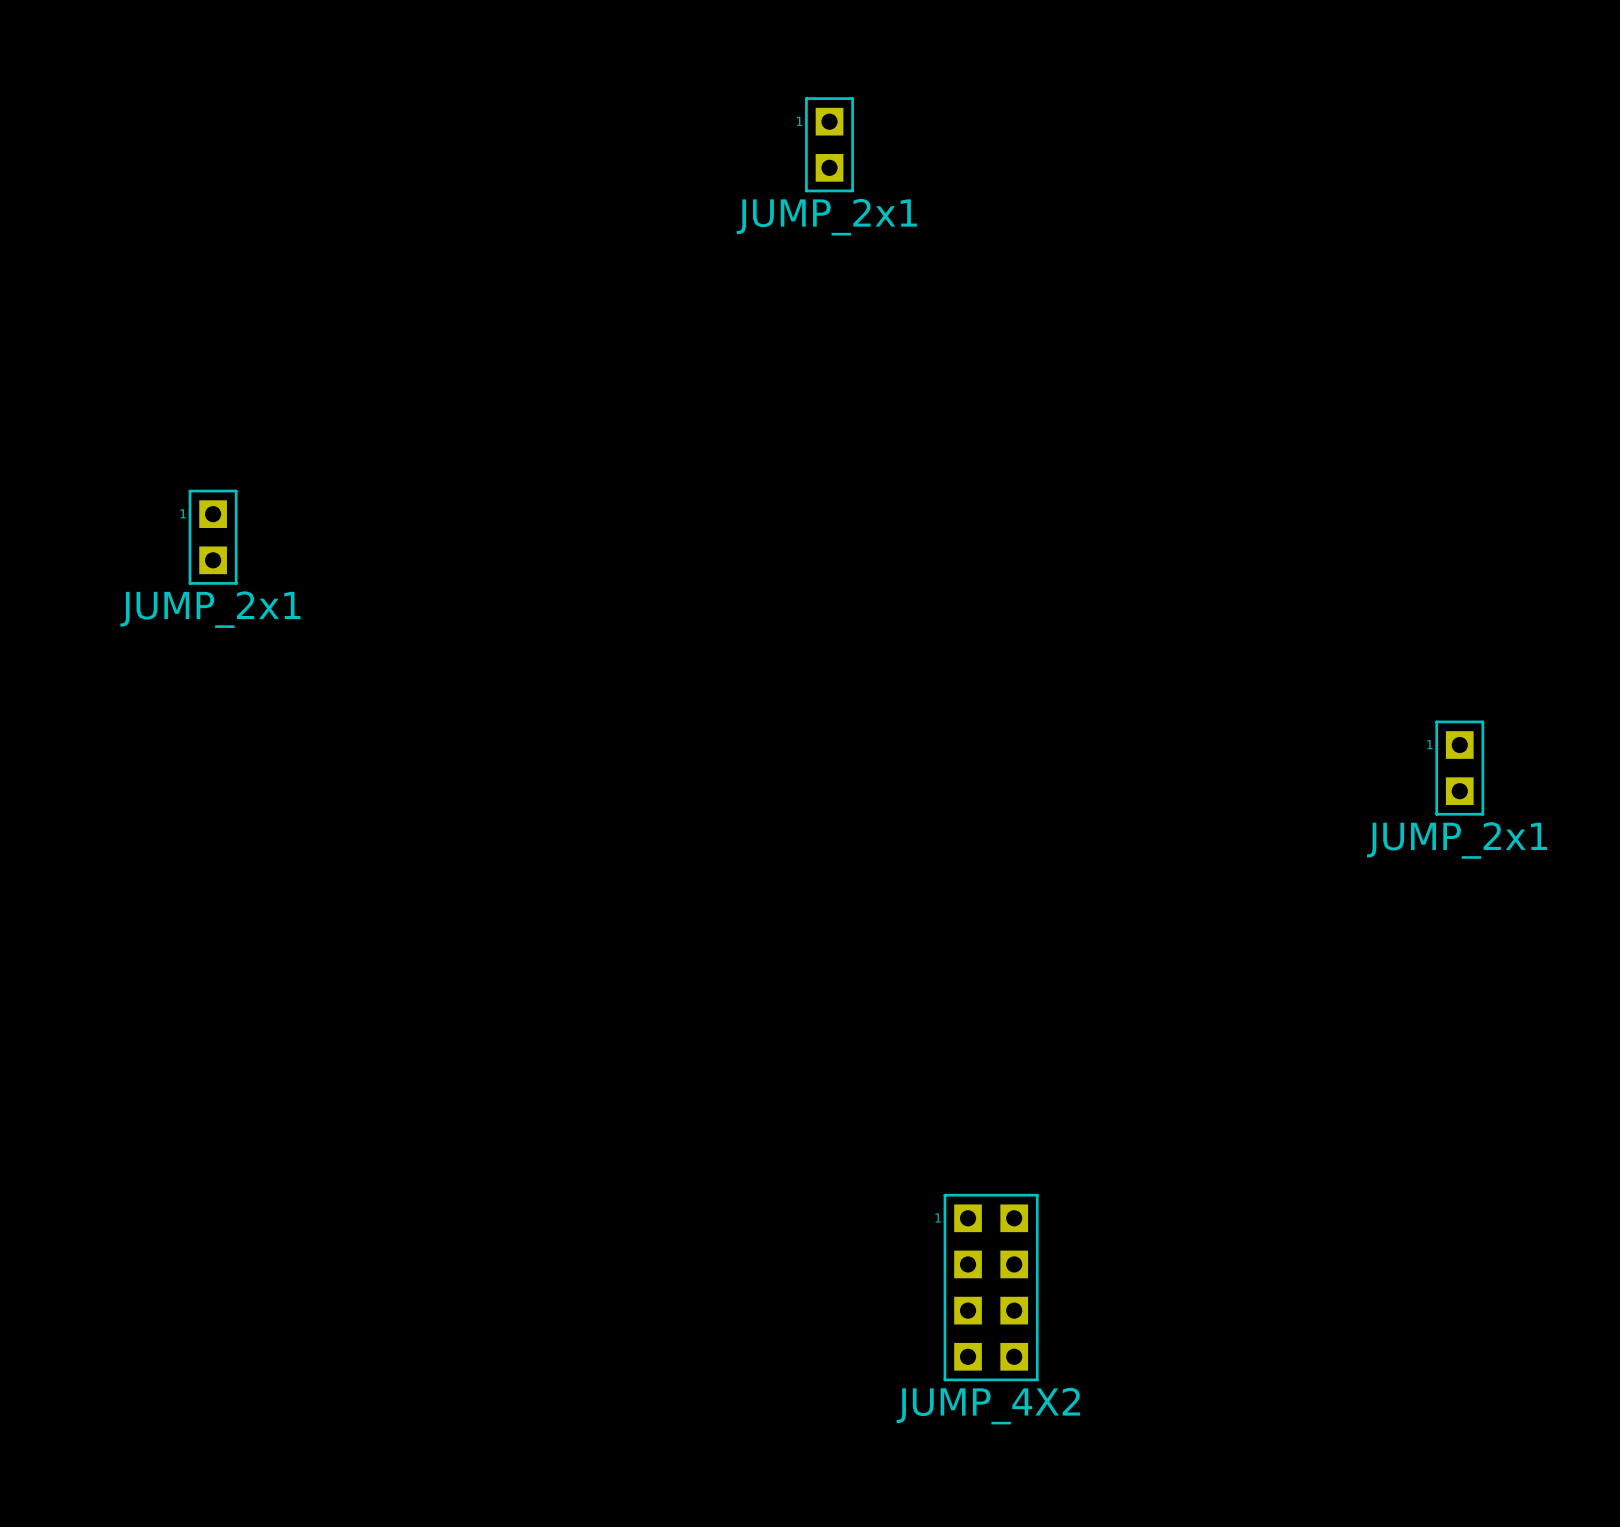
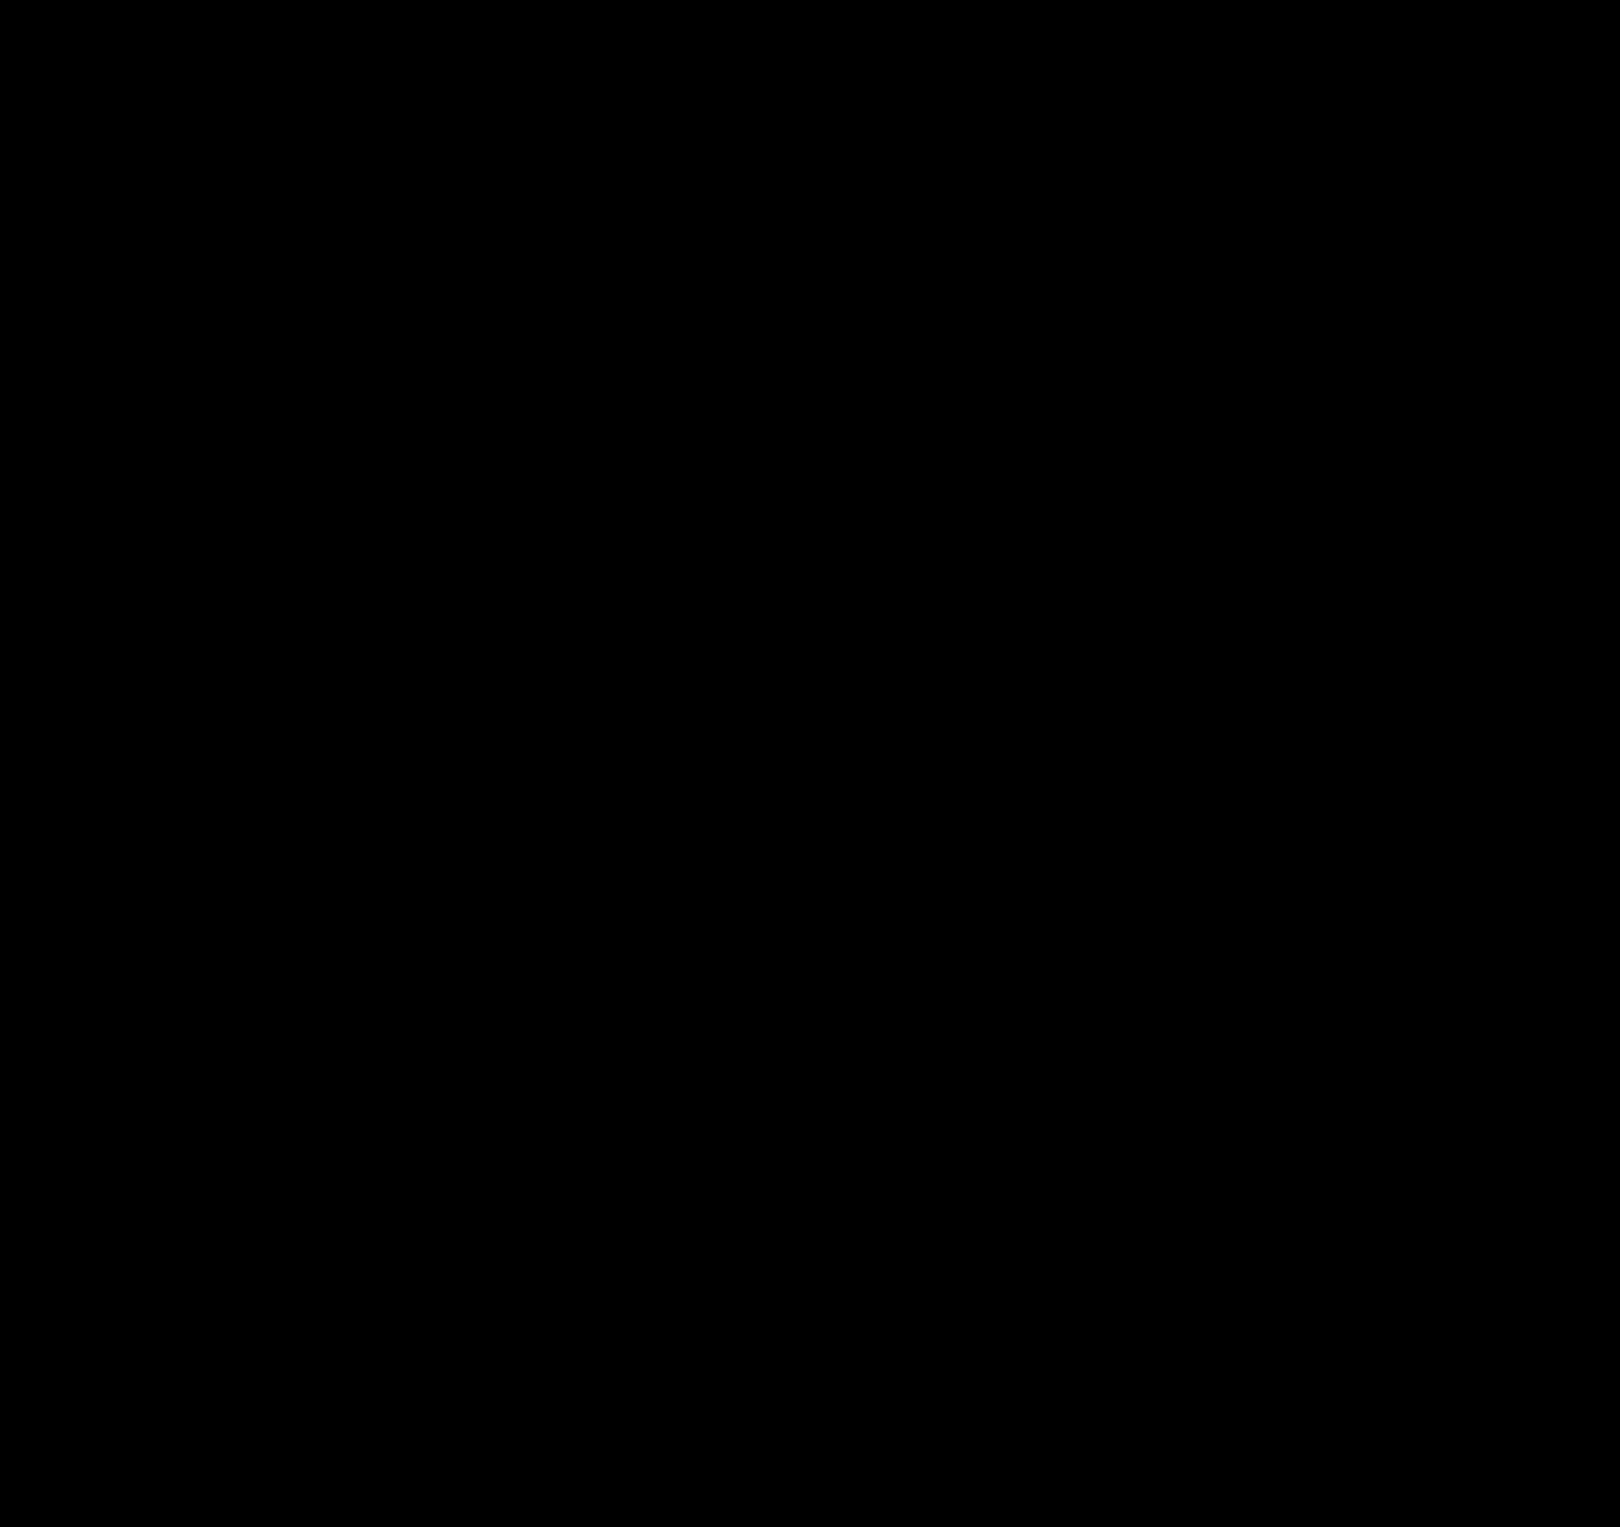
part: JUMP_2x1 (829, 144) -> none
part: JUMP_2x1 (213, 537) -> none
part: JUMP_2x1 (1459, 768) -> none
part: JUMP_4X2 (991, 1287) -> none

